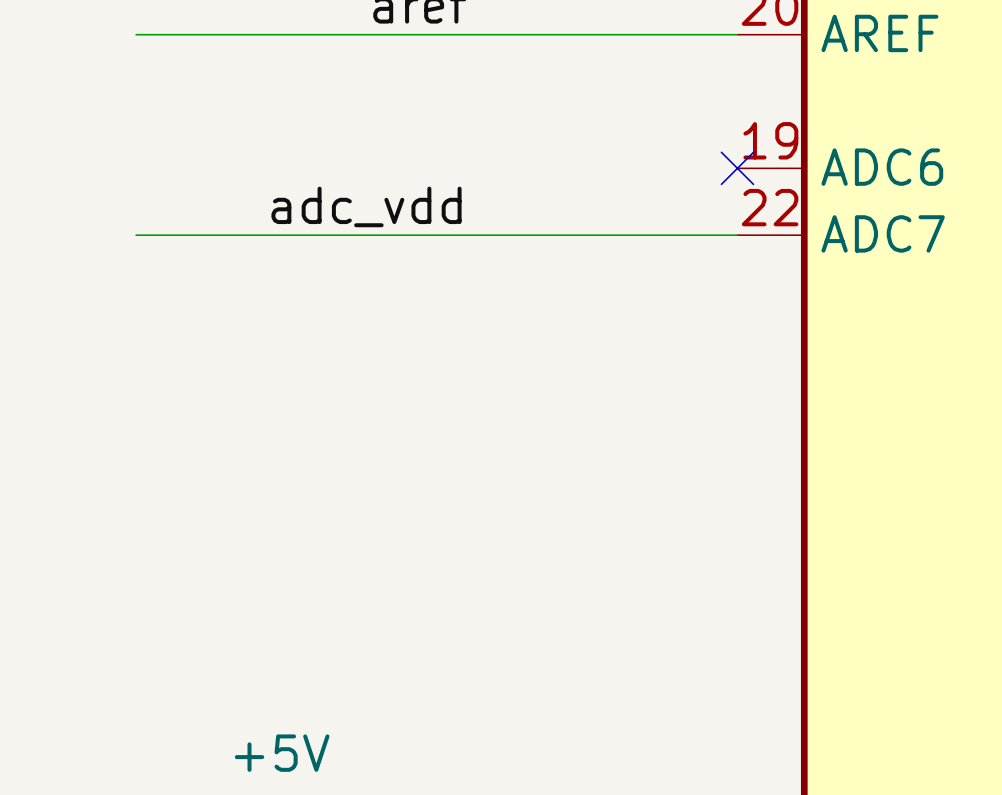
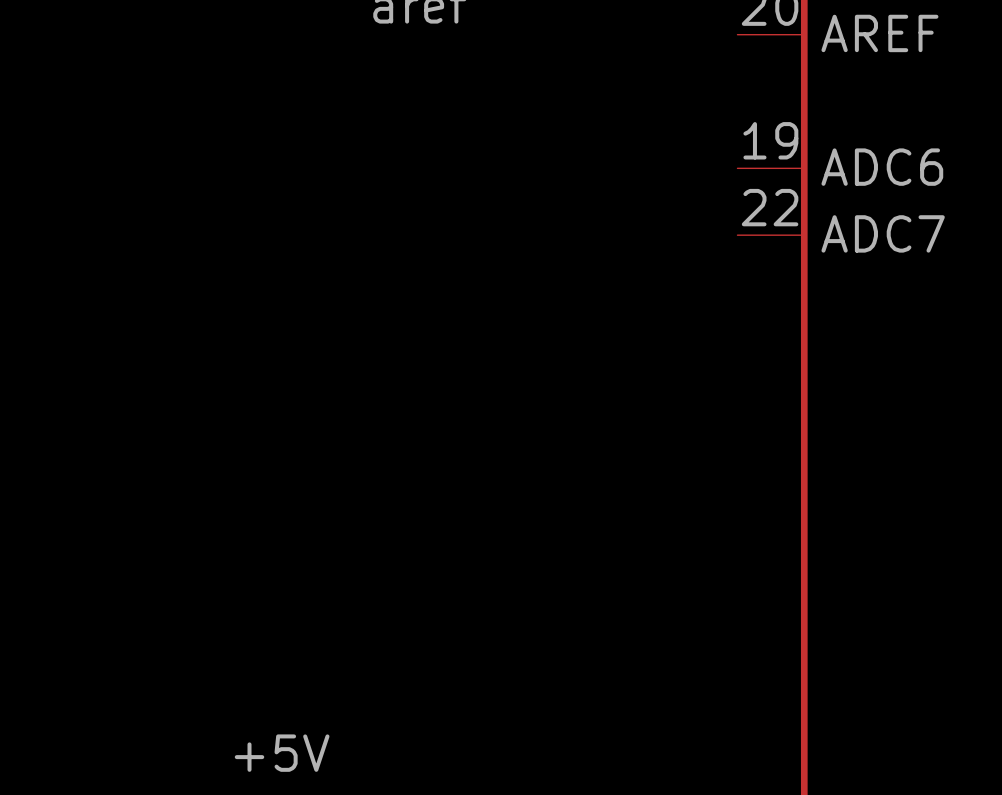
wire: (136, 34) (737, 34) -> none
no-connect mark: (737, 168) -> none
label: adc_vdd (366, 206) -> none
wire: (136, 235) (737, 235) -> none

